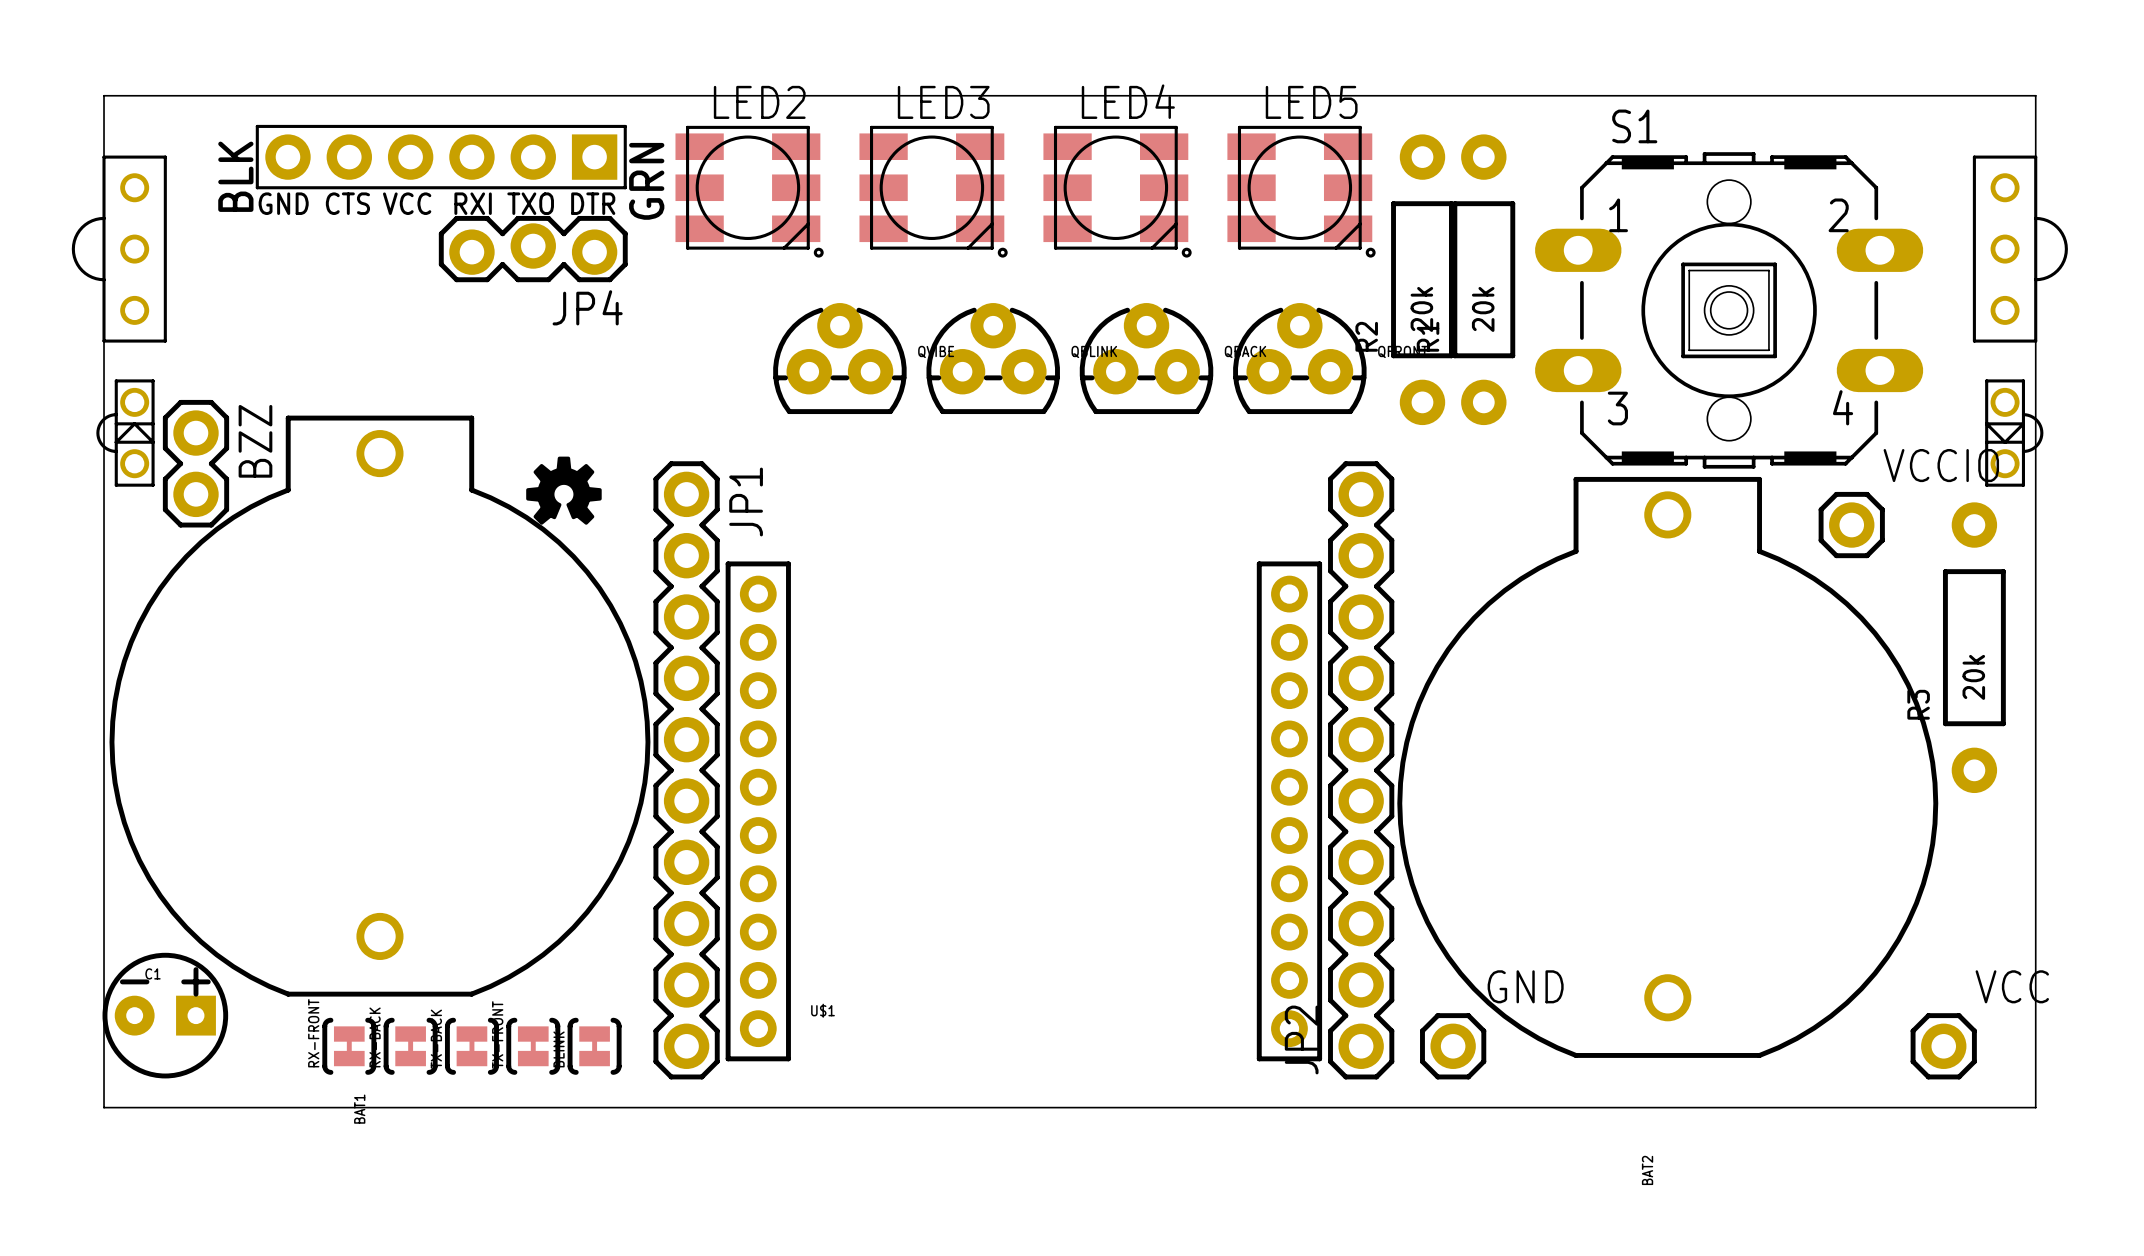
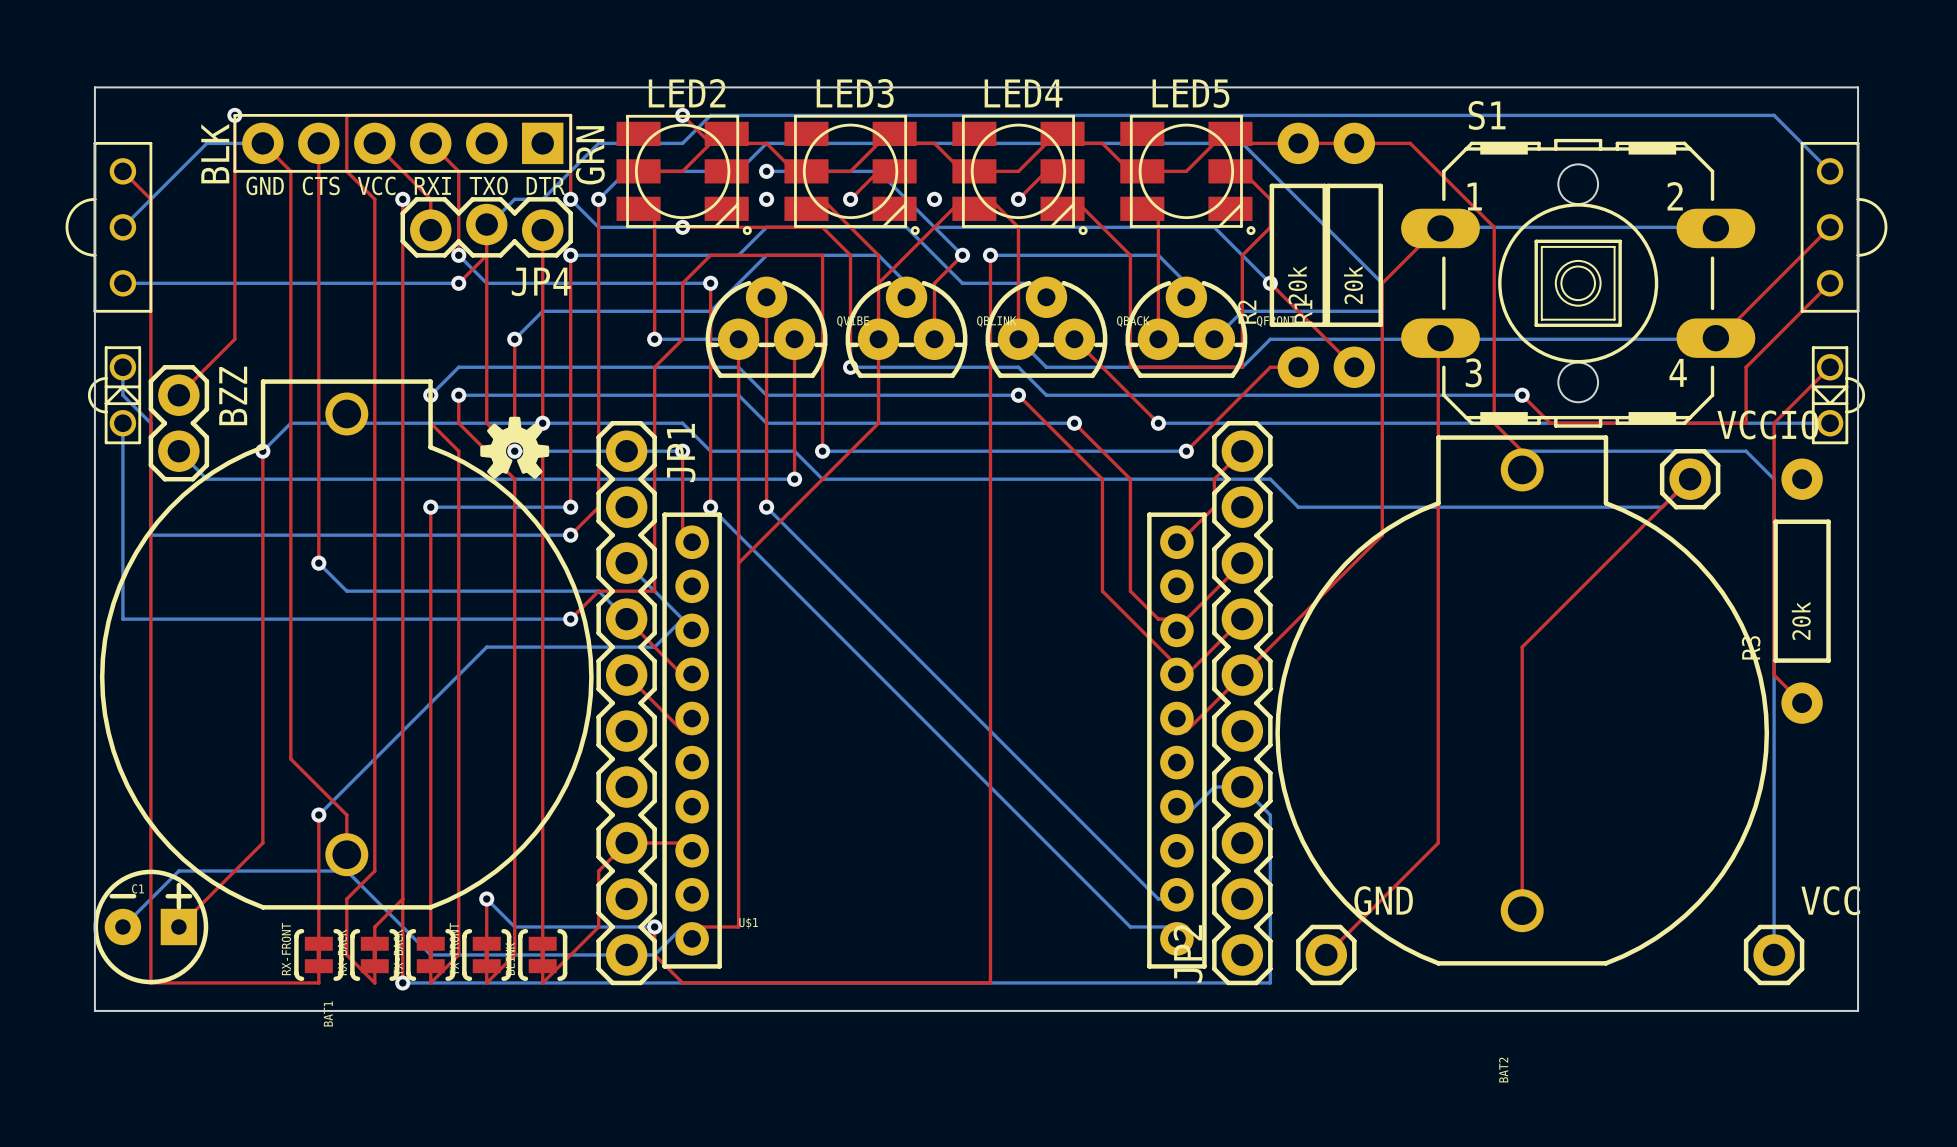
top track: none -> (234, 115) (234, 339) (178, 395)
via: none -> (234, 115)
top track: none -> (682, 115) (710, 143)
via: none -> (682, 115)
top track: none -> (262, 143) (290, 171) (290, 759) (346, 815) (346, 854)
bottom track: none -> (262, 143) (206, 143) (122, 227)
top track: none -> (318, 143) (318, 563)
top track: none -> (374, 143) (430, 199) (430, 230)
top track: none -> (430, 143) (458, 171) (458, 255)
top track: none -> (710, 143) (682, 171) (638, 171)
top track: none -> (710, 143) (726, 133) (738, 143) (766, 143) (794, 171) (850, 171) (878, 143) (894, 133) (906, 143) (934, 143) (962, 171) (1018, 171) (1046, 143) (1062, 133) (1074, 143) (1102, 143) (1130, 171) (1186, 171) (1214, 143) (1230, 133) (1242, 143) (1410, 143) (1494, 227) (1494, 423) (1522, 451) (1522, 469)
top track: none -> (122, 171) (150, 199) (150, 982) (318, 982) (318, 966)
bottom track: none -> (766, 171) (878, 171) (962, 255)
via: none -> (766, 171)
top track: none -> (894, 171) (878, 171) (850, 199)
top track: none -> (1062, 171) (1046, 171) (1018, 199)
top track: none -> (1230, 171) (1242, 171) (1270, 199) (1270, 227) (1242, 255) (1242, 367) (1130, 367) (1130, 255) (1074, 199) (1062, 208)
bottom track: none -> (1830, 171) (1774, 115) (710, 115) (682, 143) (598, 143) (542, 199) (514, 199) (486, 227) (486, 224)
top track: none -> (402, 199) (402, 982)
via: none -> (402, 199)
top track: none -> (570, 199) (570, 115) (346, 115) (346, 171) (374, 199) (374, 871) (346, 899) (346, 954) (374, 982) (374, 966)
bottom track: none -> (570, 199) (598, 227) (682, 227)
via: none -> (570, 199)
top track: none -> (598, 199) (598, 507) (570, 535)
bottom track: none -> (598, 199) (626, 171) (738, 171) (766, 143) (1242, 143) (1382, 283) (1382, 311) (1242, 311) (1214, 339)
via: none -> (598, 199)
via: none -> (766, 199)
via: none -> (850, 199)
via: none -> (934, 199)
via: none -> (1018, 199)
top track: none -> (638, 208) (654, 199) (654, 339)
top track: none -> (806, 208) (822, 199) (878, 255) (878, 423) (738, 563)
top track: none -> (1142, 208) (1158, 199) (1158, 339)
top track: none -> (486, 224) (486, 423) (514, 451)
top track: none -> (542, 227) (542, 423)
top track: none -> (682, 227) (822, 227) (850, 255) (850, 367)
via: none -> (682, 227)
bottom track: none -> (934, 227) (1214, 227) (1270, 283)
top track: none -> (1830, 227) (1718, 339) (1715, 338)
top track: none -> (1440, 228) (1438, 227) (1382, 283) (1382, 535) (1186, 731) (1176, 718)
bottom track: none -> (1440, 228) (1715, 228)
bottom track: none -> (458, 255) (486, 283) (710, 283)
via: none -> (458, 255)
top track: none -> (486, 255) (458, 283)
top track: none -> (570, 255) (570, 507)
bottom track: none -> (570, 255) (738, 255) (766, 227) (906, 227) (962, 283) (1046, 283) (1046, 297)
via: none -> (570, 255)
top track: none -> (962, 255) (934, 283) (934, 339)
via: none -> (962, 255)
top track: none -> (990, 255) (990, 982) (682, 982) (654, 954) (654, 926)
bottom track: none -> (990, 255) (1158, 255) (1186, 283) (1186, 297)
via: none -> (990, 255)
bottom track: none -> (122, 283) (458, 283)
via: none -> (458, 283)
top track: none -> (710, 283) (710, 507)
via: none -> (710, 283)
top track: none -> (878, 283) (962, 199) (974, 208) (990, 199) (1018, 227) (1018, 339)
top track: none -> (1270, 283) (1354, 367)
via: none -> (1270, 283)
top track: none -> (1830, 283) (1746, 367) (1746, 423) (1550, 423) (1522, 395)
top track: none -> (766, 297) (766, 507)
bottom track: none -> (906, 297) (906, 283) (878, 255) (766, 255) (710, 311) (542, 311) (514, 339)
top track: none -> (1440, 338) (1438, 339) (1438, 843) (1326, 954)
bottom track: none -> (1715, 338) (1270, 339) (1242, 367) (1046, 367) (1018, 339)
top track: none -> (514, 339) (514, 423) (542, 451) (542, 943)
via: none -> (514, 339)
bottom track: none -> (654, 339) (738, 339)
via: none -> (654, 339)
top track: none -> (738, 339) (738, 926) (682, 926) (692, 938)
top track: none -> (794, 339) (794, 479)
top track: none -> (1074, 339) (1158, 423)
bottom track: none -> (122, 367) (122, 395) (150, 423) (150, 535) (570, 535)
bottom track: none -> (850, 367) (1018, 367) (1046, 395) (1522, 395)
via: none -> (850, 367)
top track: none -> (1298, 367) (1270, 367) (1186, 451)
top track: none -> (1830, 367) (1774, 423) (1774, 675) (1802, 703)
top track: none -> (430, 395) (430, 423) (458, 451) (458, 954) (430, 982) (430, 966)
bottom track: none -> (430, 395) (458, 367) (738, 367) (766, 395) (1018, 395)
via: none -> (430, 395)
top track: none -> (458, 395) (458, 423) (514, 479) (514, 954) (486, 982) (486, 966)
bottom track: none -> (458, 395) (738, 395) (766, 423) (1074, 423)
via: none -> (458, 395)
top track: none -> (1018, 395) (1102, 479) (1102, 591) (1186, 675)
via: none -> (1018, 395)
via: none -> (1522, 395)
bottom track: none -> (122, 423) (122, 619) (570, 619)
via: none -> (542, 423)
top track: none -> (1074, 423) (1130, 479) (1130, 591) (1158, 619) (1186, 619)
via: none -> (1074, 423)
bottom track: none -> (1158, 423) (1830, 423)
via: none -> (1158, 423)
bottom track: none -> (178, 451) (206, 479) (794, 479)
top track: none -> (262, 451) (262, 843) (178, 926)
bottom track: none -> (262, 451) (290, 423) (682, 423) (710, 451) (794, 451) (822, 479) (1270, 479) (1298, 507) (1662, 507) (1690, 479)
via: none -> (262, 451)
bottom track: none -> (514, 451) (682, 451)
via: none -> (514, 451)
top track: none -> (682, 451) (682, 535) (692, 542)
via: none -> (682, 451)
top track: none -> (822, 451) (822, 255) (710, 255) (682, 283) (682, 339) (654, 367) (654, 591) (598, 591) (570, 619)
bottom track: none -> (822, 451) (1186, 451)
via: none -> (822, 451)
via: none -> (1186, 451)
top track: none -> (1242, 451) (1214, 479) (1214, 507) (1176, 542)
bottom track: none -> (1522, 469) (1522, 451) (1746, 451) (1774, 479) (1774, 954)
via: none -> (794, 479)
top track: none -> (1690, 479) (1522, 647) (1522, 910)
top track: none -> (430, 507) (430, 943)
bottom track: none -> (430, 507) (570, 507)
via: none -> (430, 507)
via: none -> (570, 507)
bottom track: none -> (710, 507) (1130, 926) (1186, 926) (1176, 938)
via: none -> (710, 507)
bottom track: none -> (766, 507) (1158, 899) (1186, 899) (1176, 894)
via: none -> (766, 507)
via: none -> (570, 535)
bottom track: none -> (318, 563) (346, 591) (598, 591) (626, 619)
via: none -> (318, 563)
bottom track: none -> (626, 563) (682, 619)
top track: none -> (1242, 563) (1186, 619)
via: none -> (570, 619)
top track: none -> (626, 619) (682, 675) (692, 674)
bottom track: none -> (682, 619) (654, 647) (486, 647) (318, 815)
top track: none -> (1242, 619) (1186, 675)
top track: none -> (626, 675) (682, 731) (692, 718)
bottom track: none -> (1176, 806) (1186, 815) (1214, 787) (1242, 787) (1270, 815) (1270, 982) (402, 982)
top track: none -> (318, 815) (318, 943)
via: none -> (318, 815)
top track: none -> (692, 850) (682, 843) (626, 843) (598, 871) (598, 926) (542, 982) (542, 966)
bottom track: none -> (346, 871) (178, 871) (122, 926)
bottom track: none -> (346, 871) (430, 954) (654, 954) (682, 926) (692, 938)
top track: none -> (402, 899) (374, 926) (374, 943)
top track: none -> (486, 899) (486, 943)
bottom track: none -> (486, 899) (514, 926) (654, 926)
via: none -> (486, 899)
via: none -> (654, 926)
via: none -> (402, 982)

